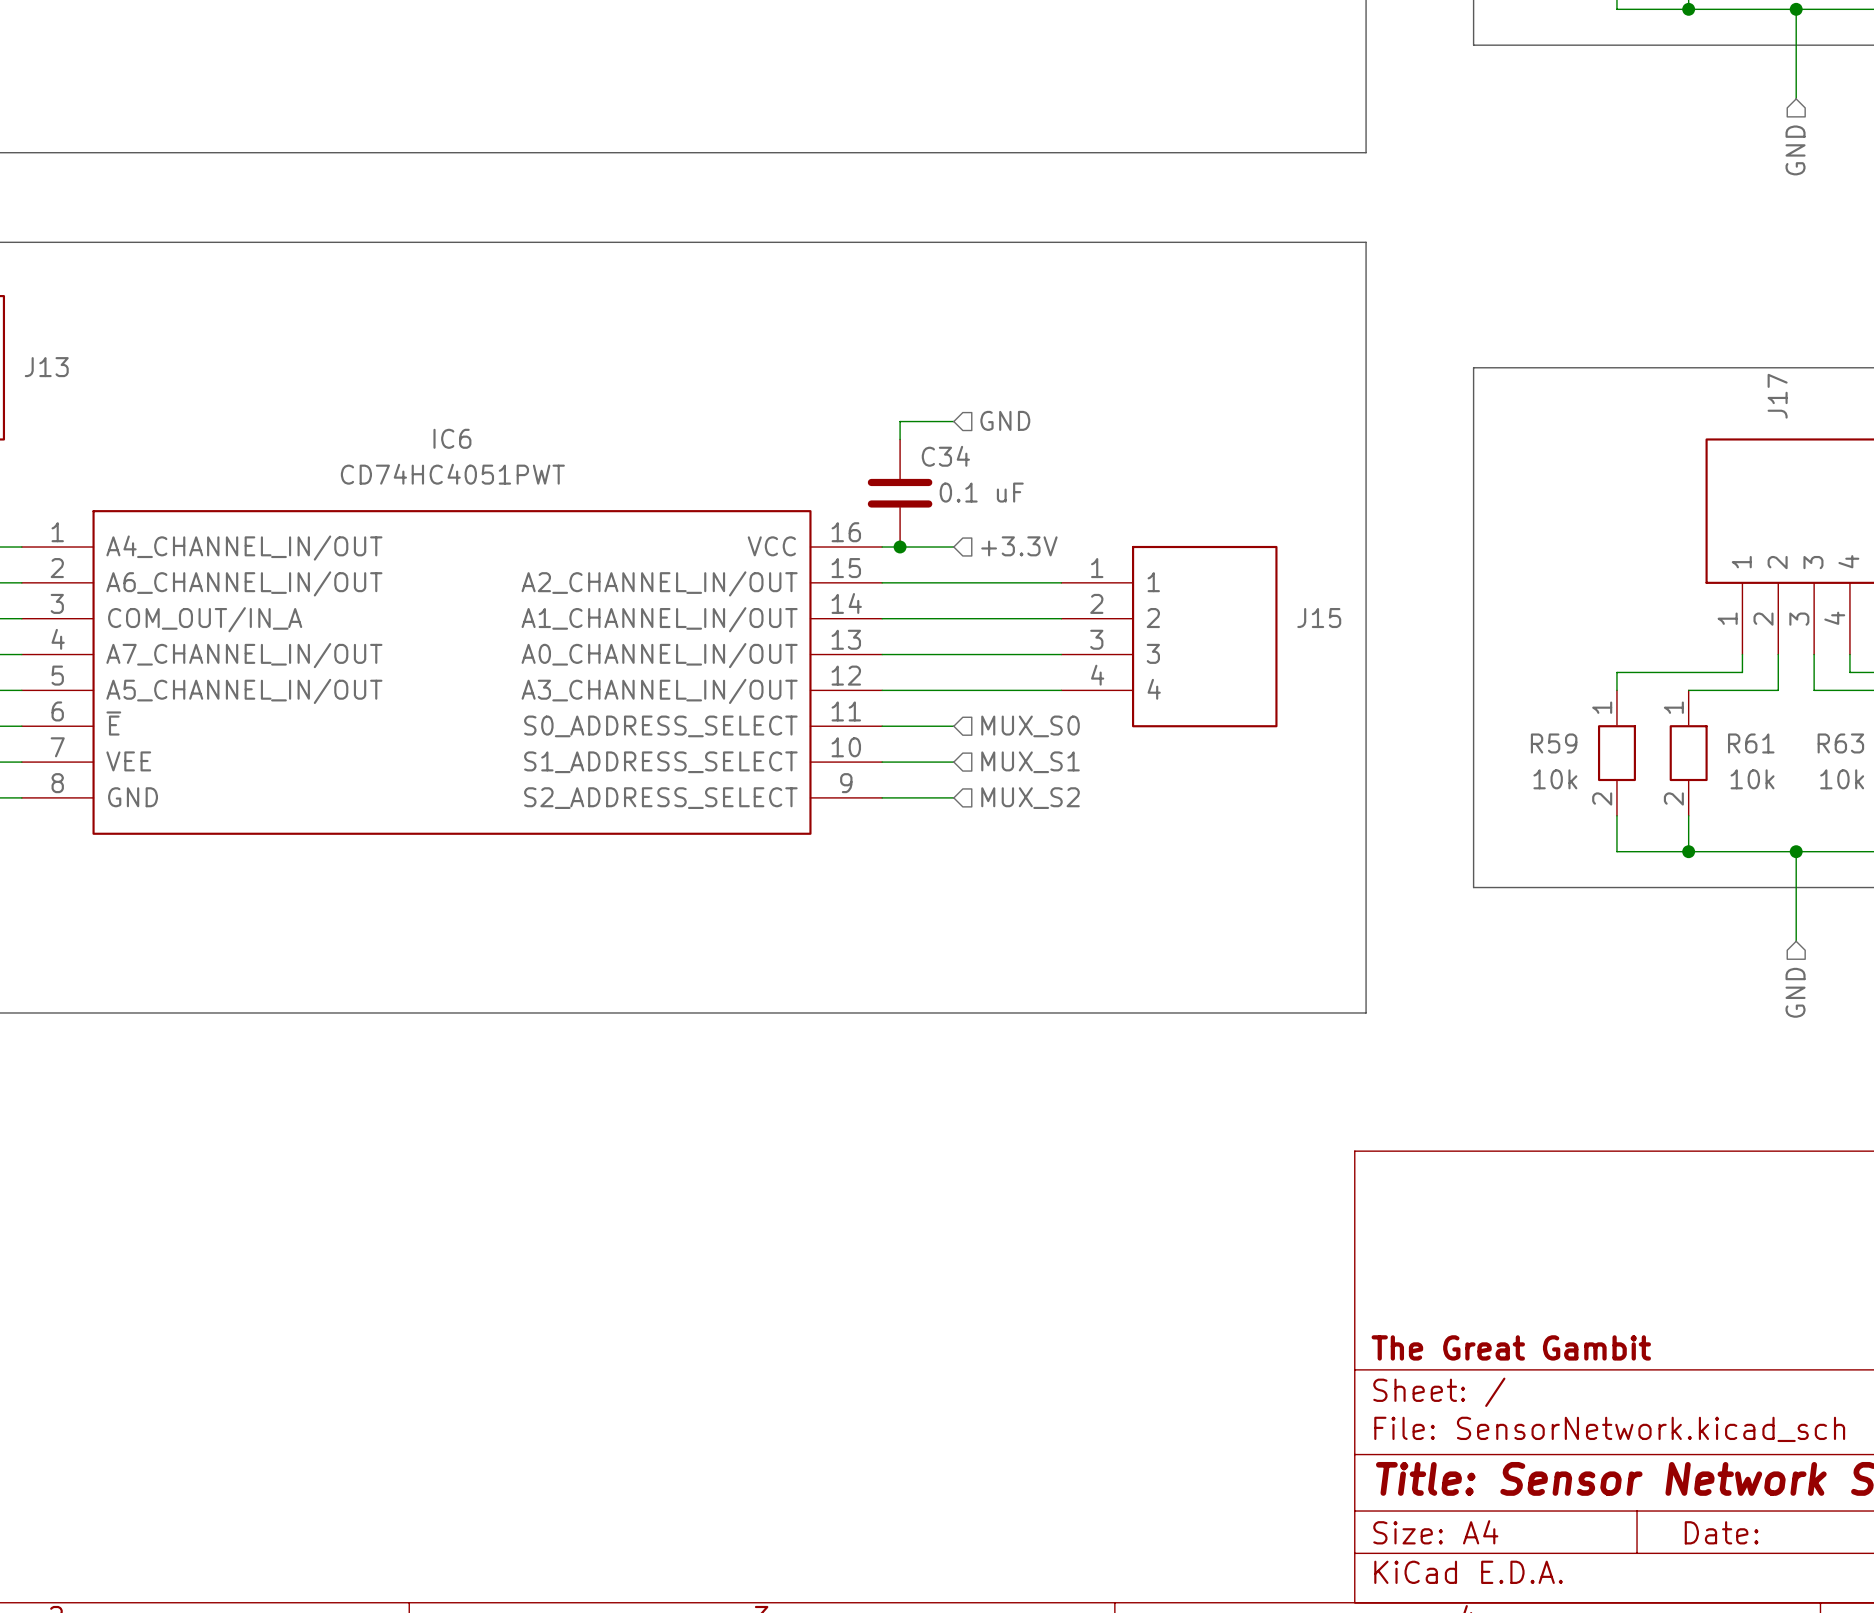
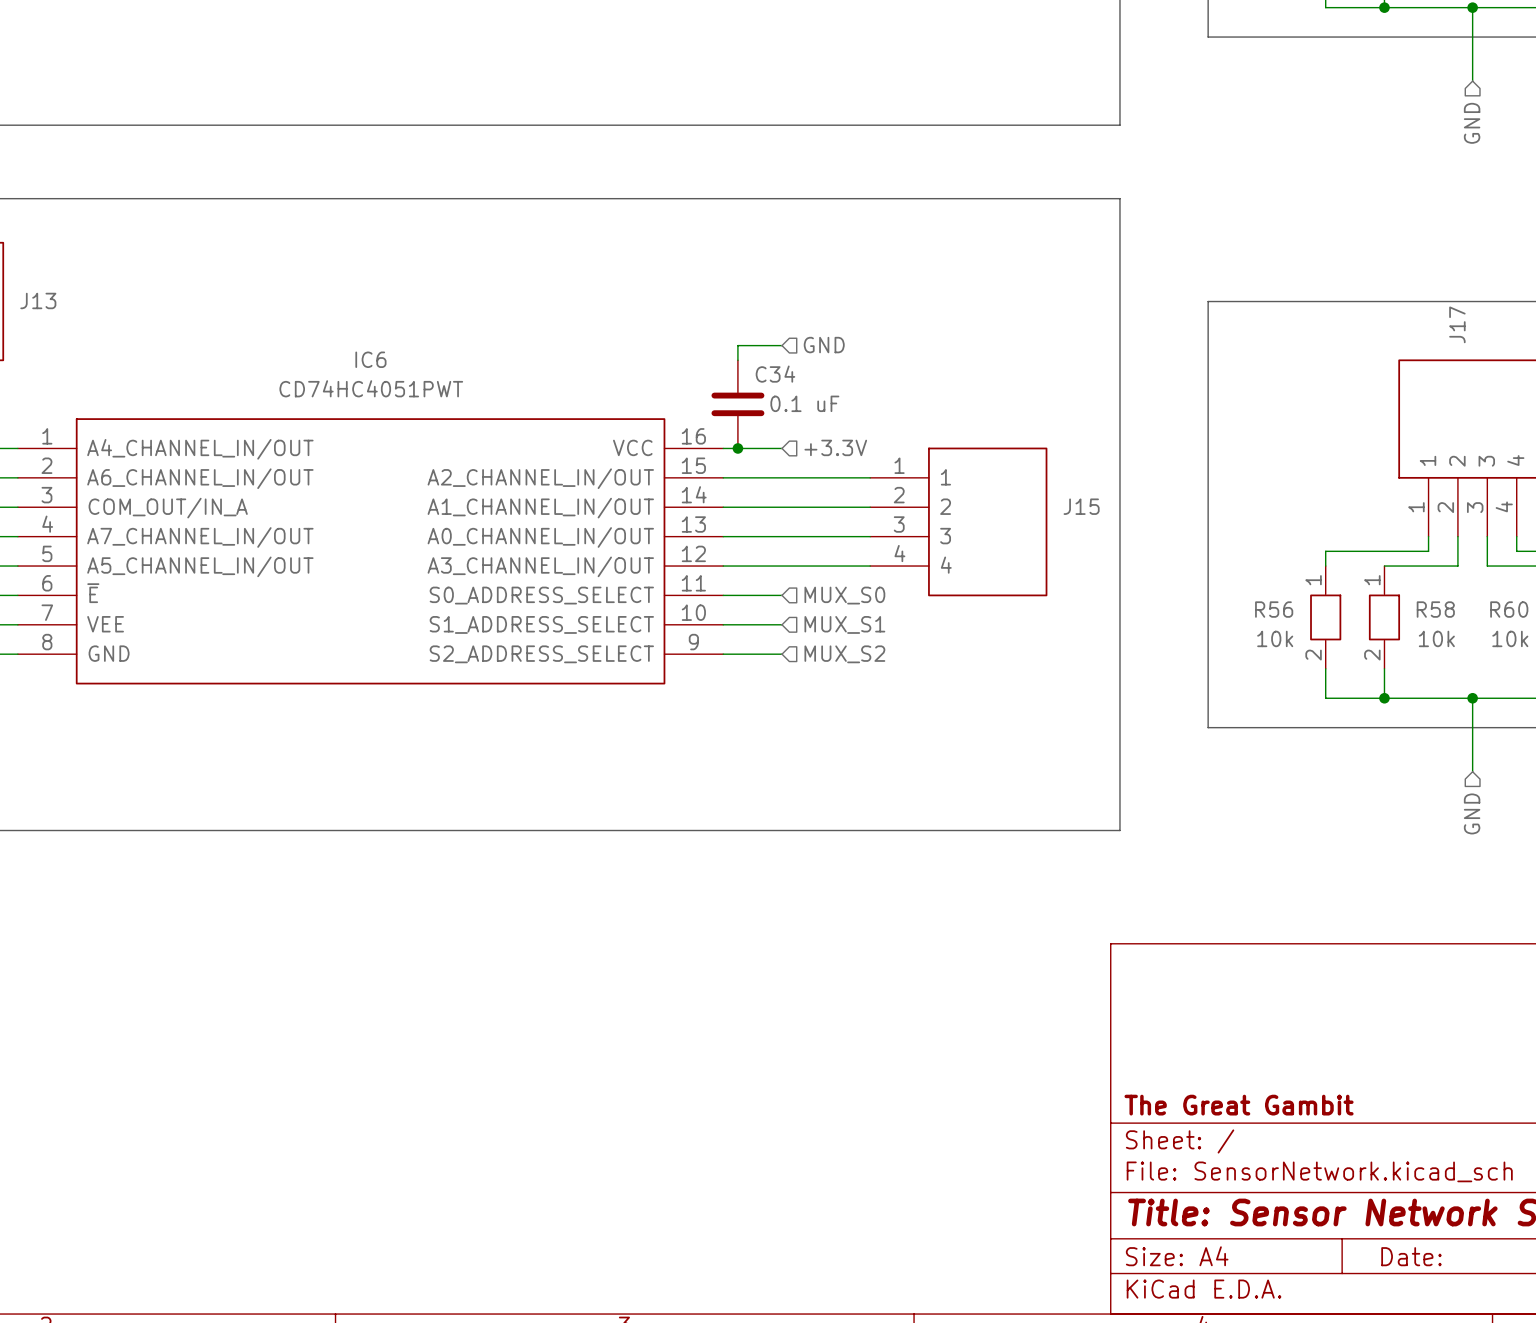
R59 name: R59 (1554, 743) -> R56 (1274, 609)
R61 name: R61 (1751, 743) -> R58 (1435, 609)
R63 name: R63 (1840, 743) -> R60 (1509, 609)

